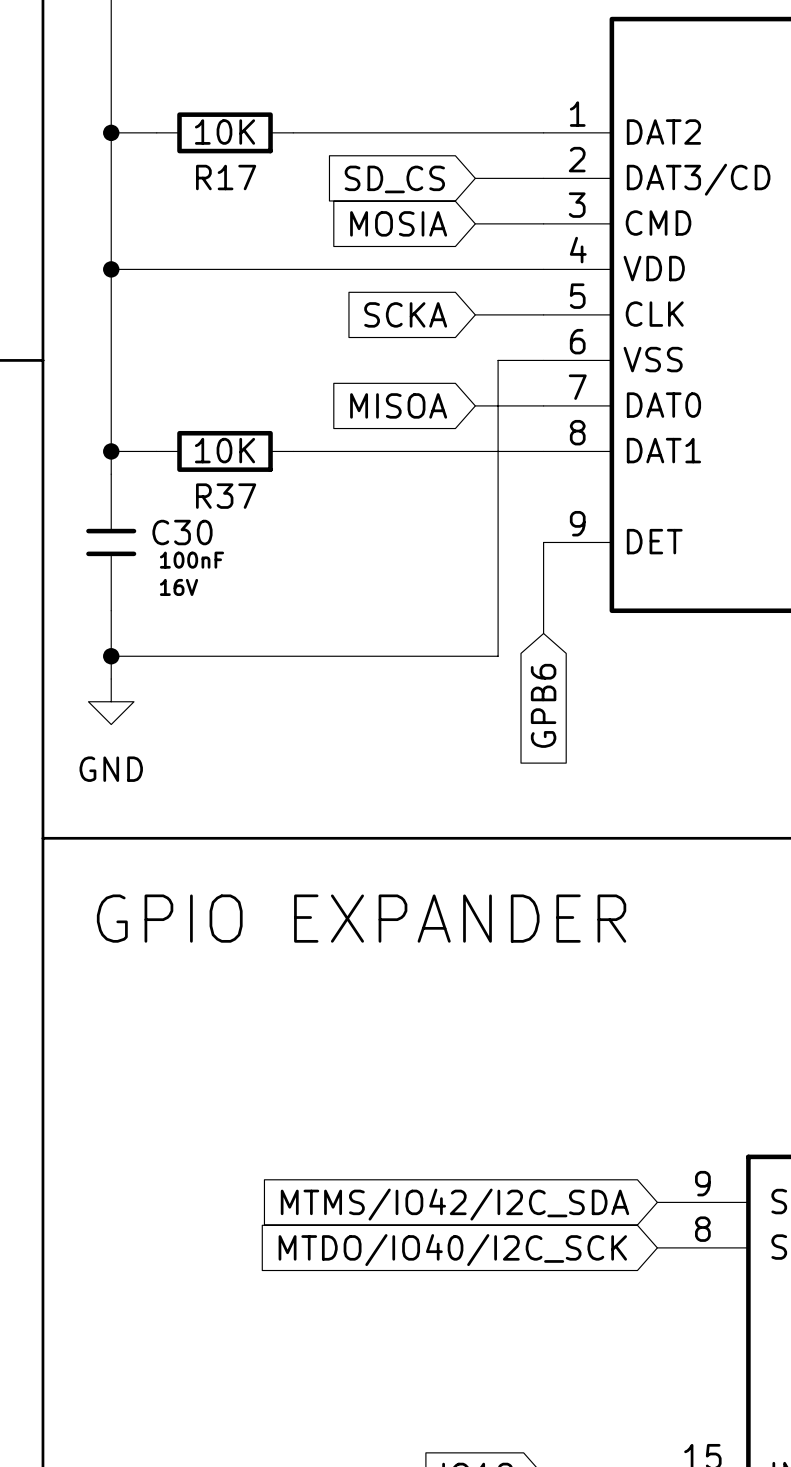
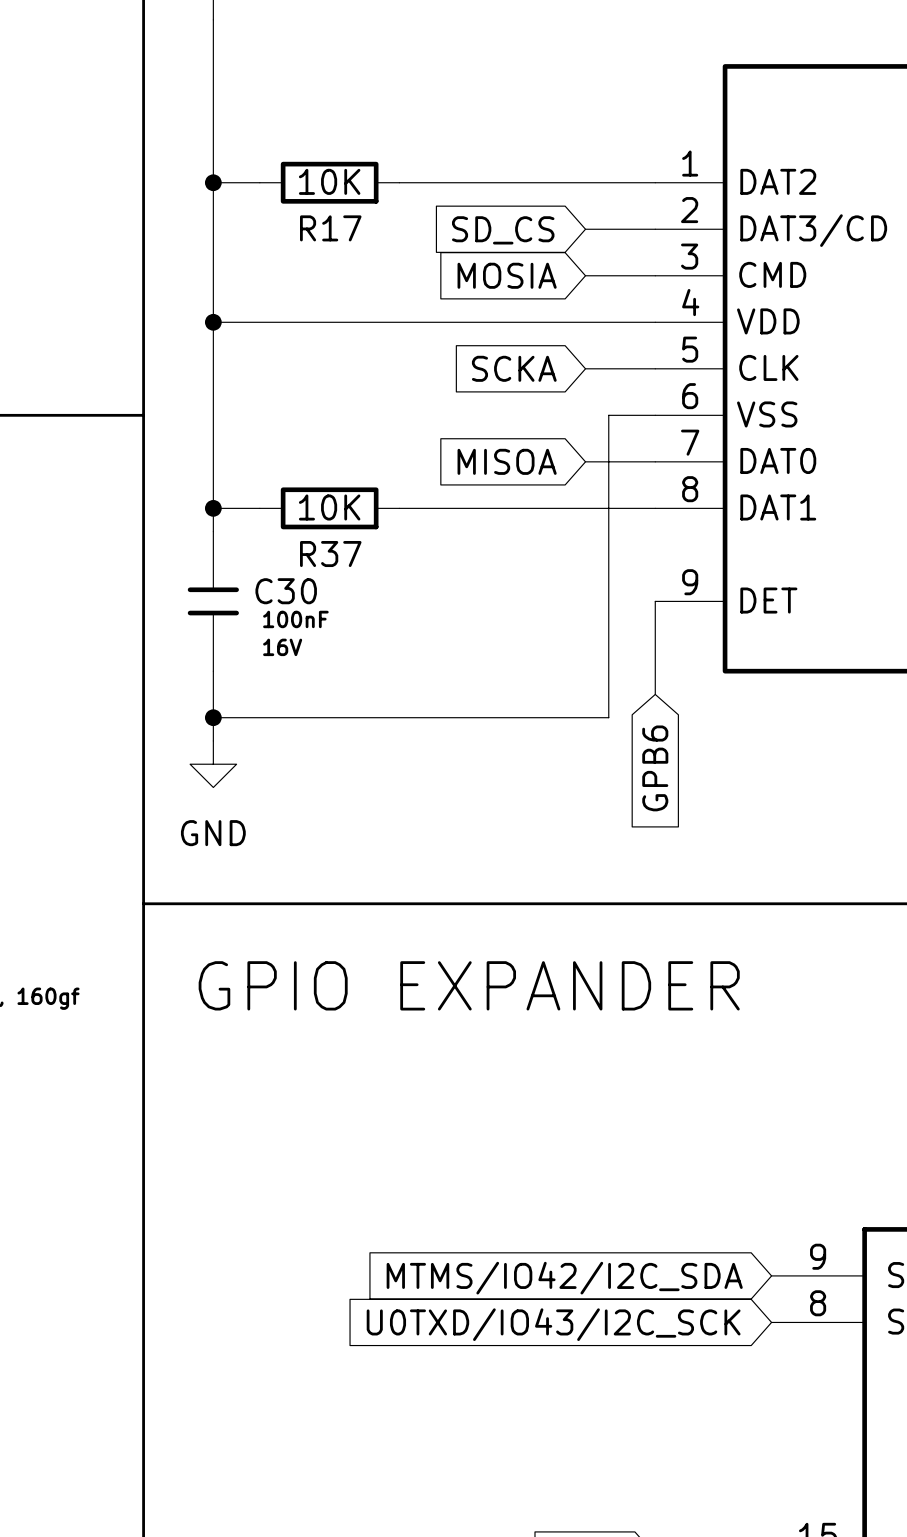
global label: MTDO/IO40/I2C_SCK (452, 1250) -> U0TXD/IO43/I2C_SCK (553, 1324)

